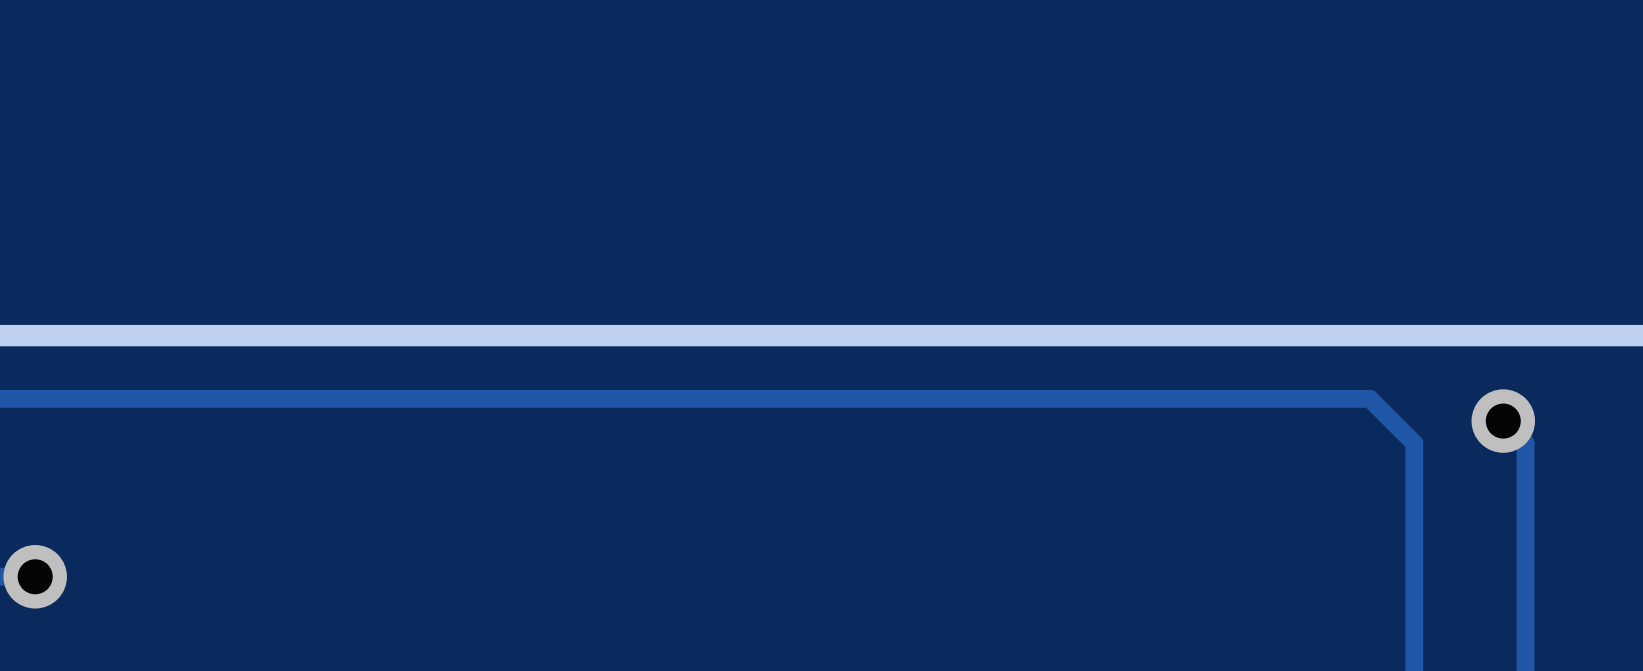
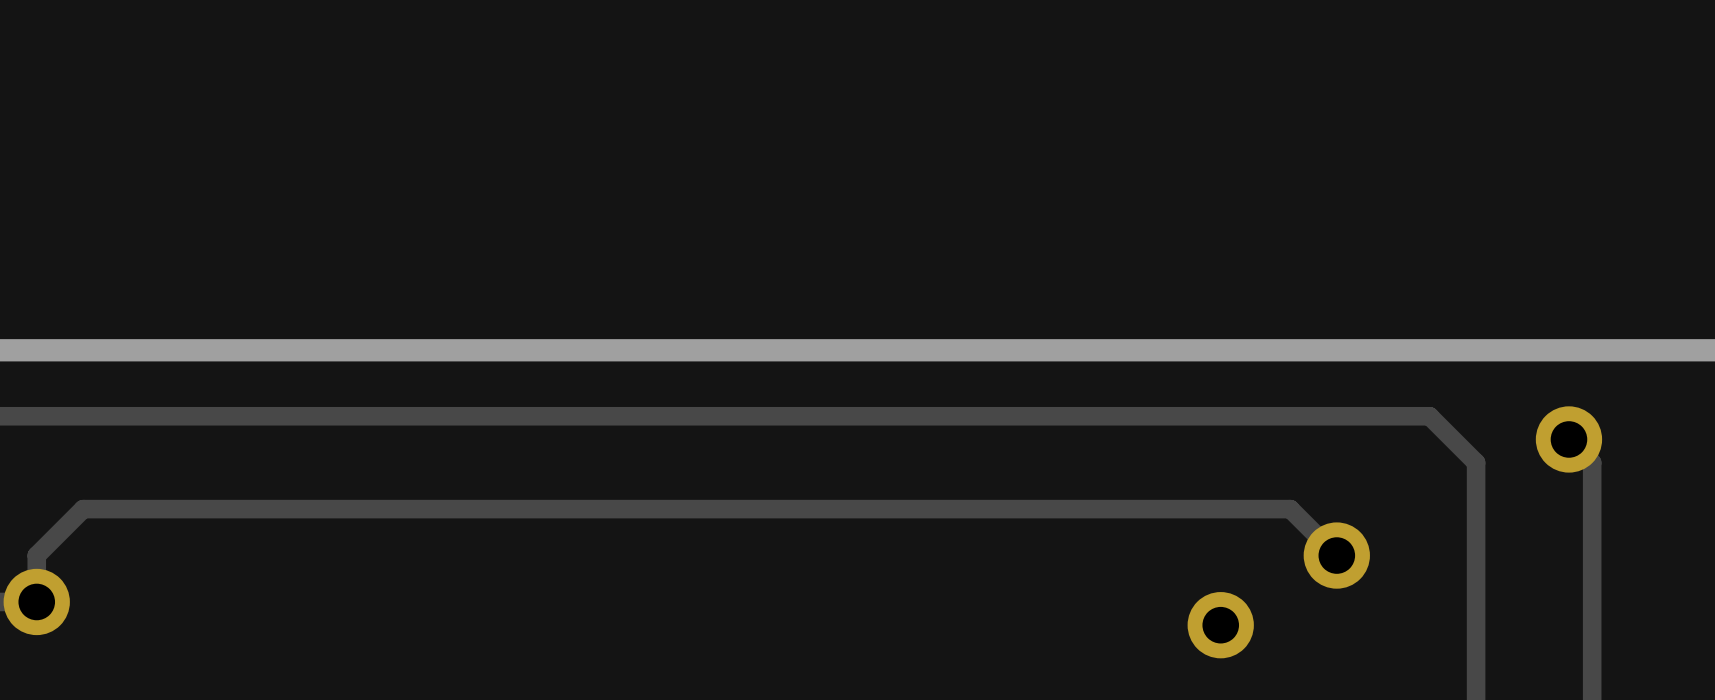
track: none -> (1336, 555) (1290, 509) (83, 509) (36, 555) (36, 601)
via: none -> (1336, 555)
via: none -> (1220, 625)

